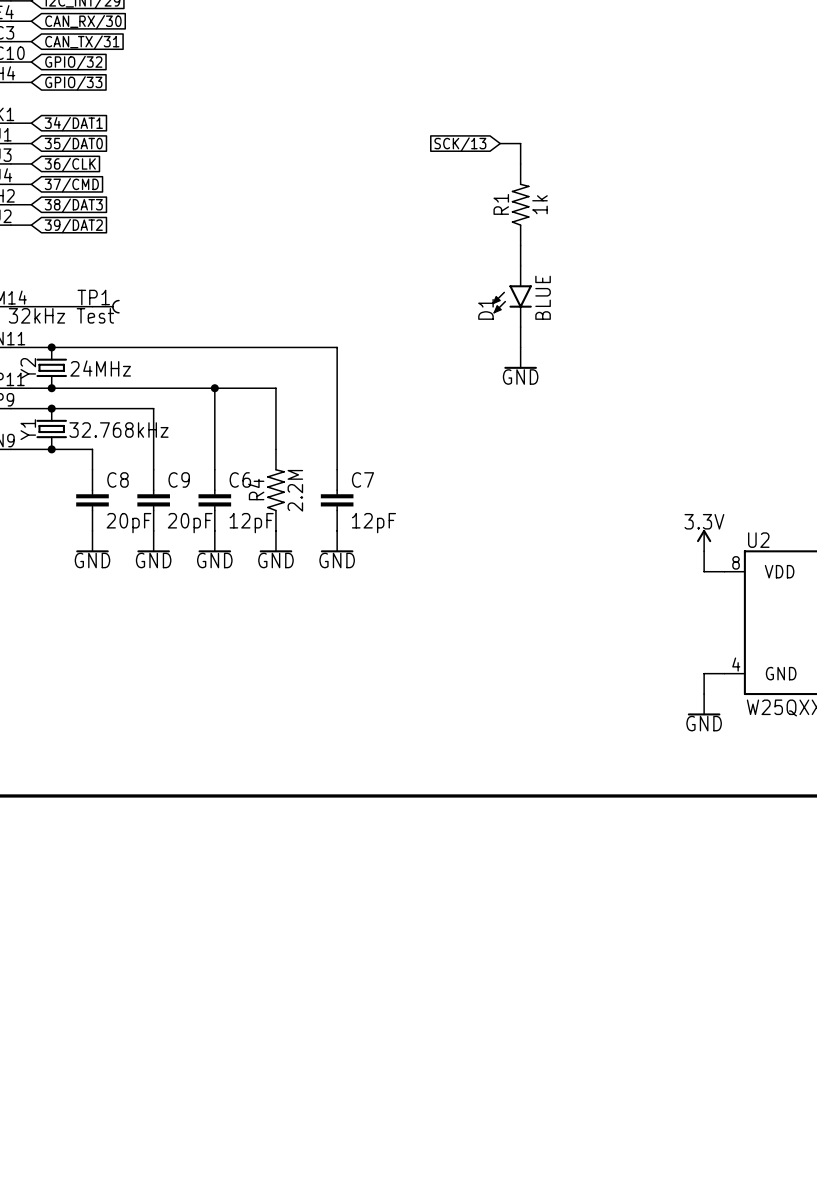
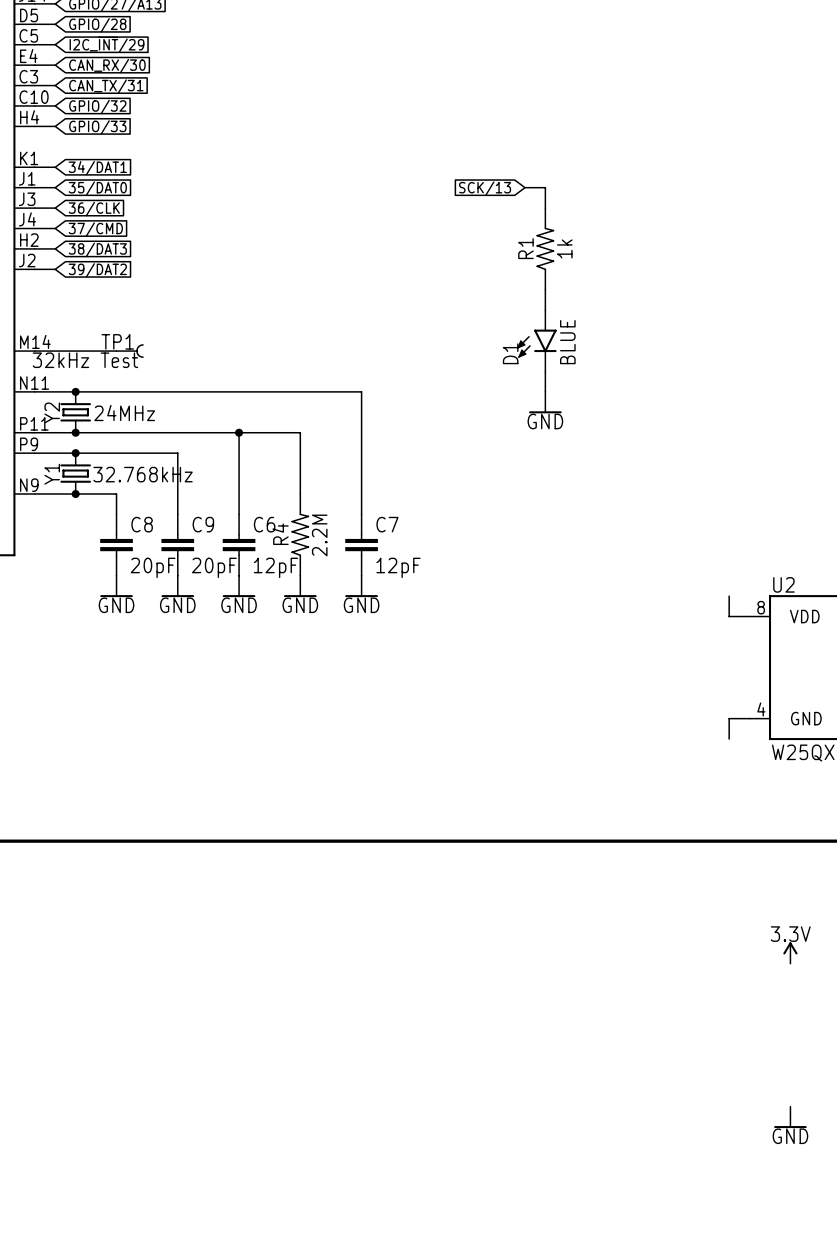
power symbol: 3.3V (704, 540) -> none
power symbol: GND (704, 704) -> none
power symbol: none -> 3.3V (790, 952)
power symbol: none -> GND (790, 1117)

